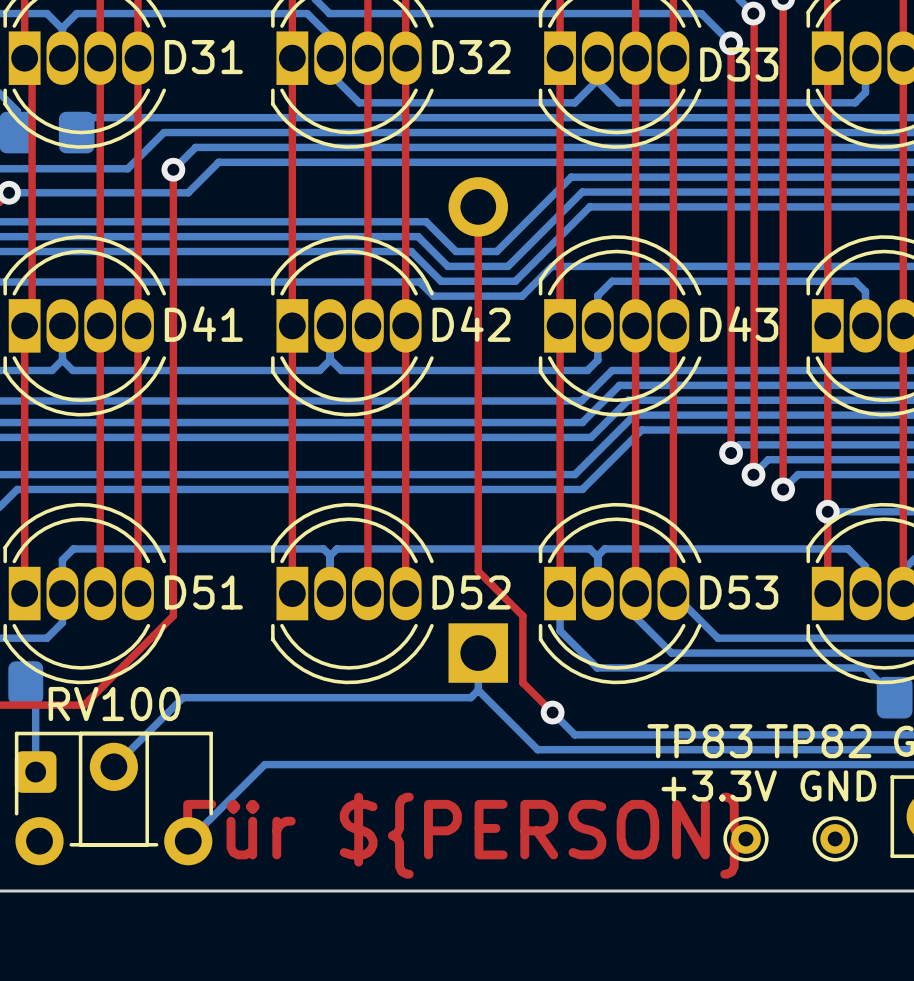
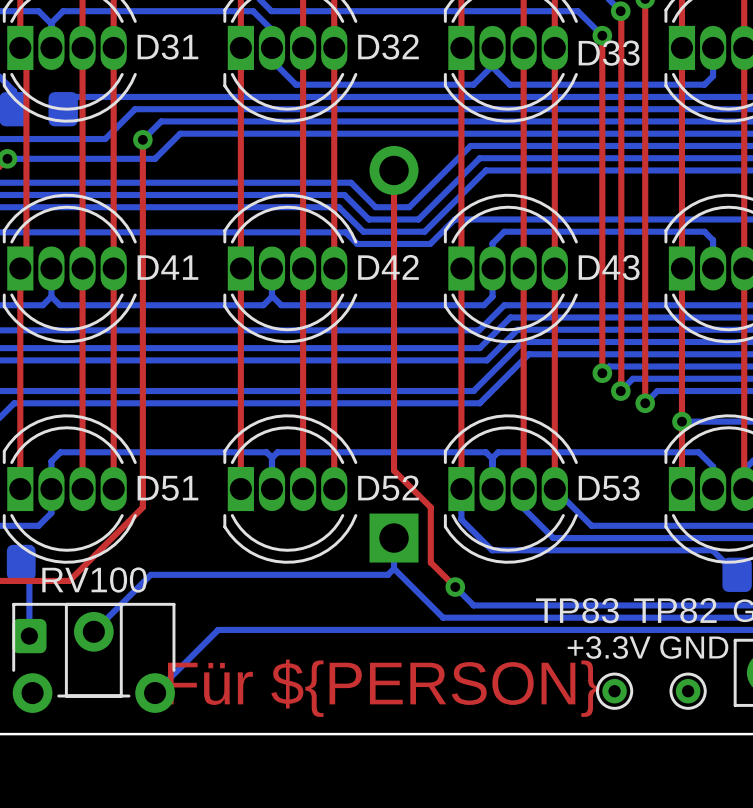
text: +3.3V GND (768, 785) -> +3.3V (609, 647)
text: none -> GND (694, 647)

